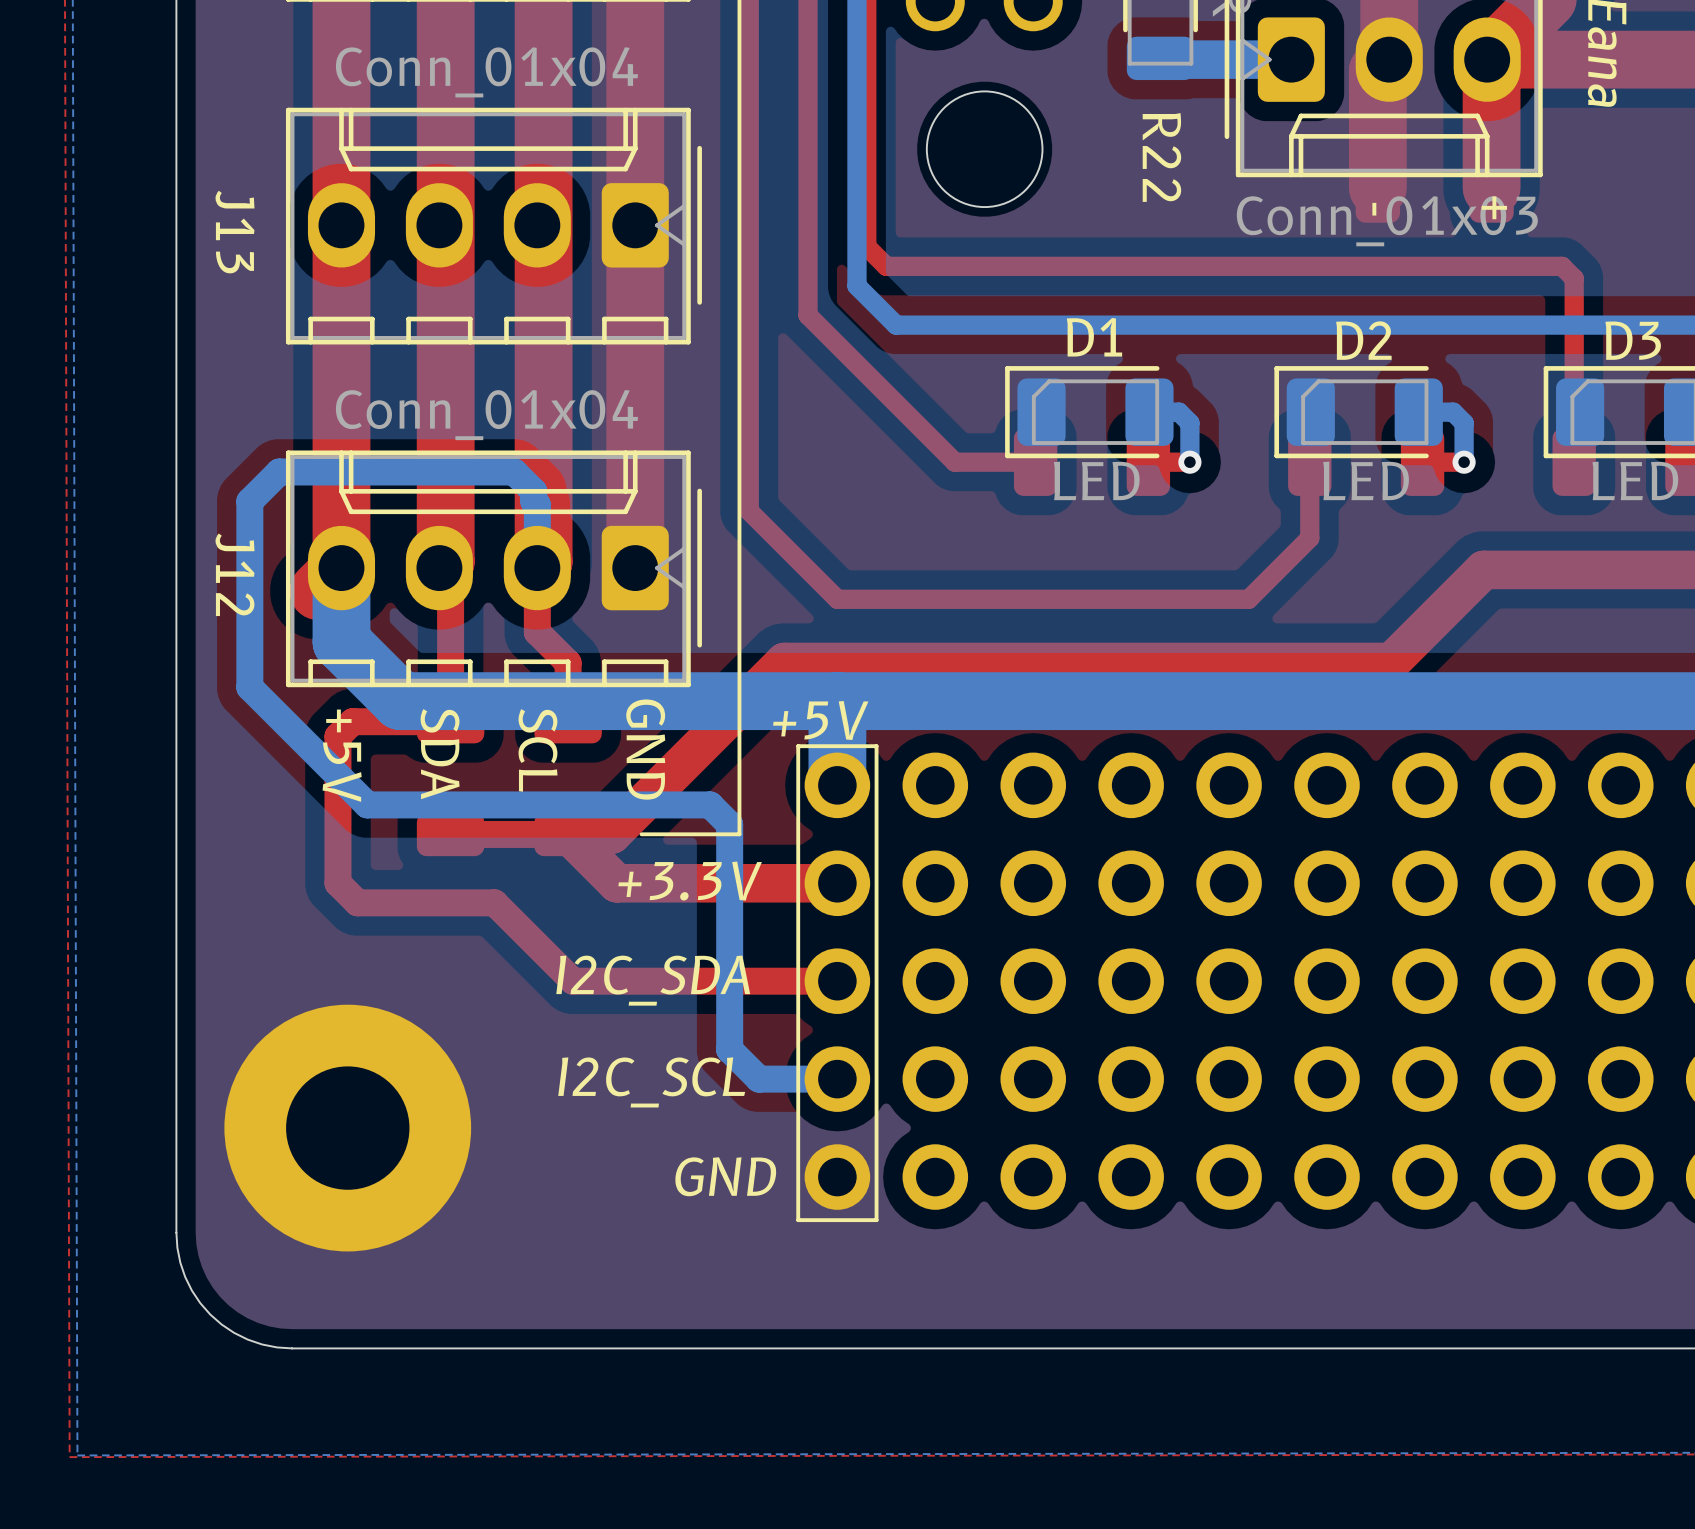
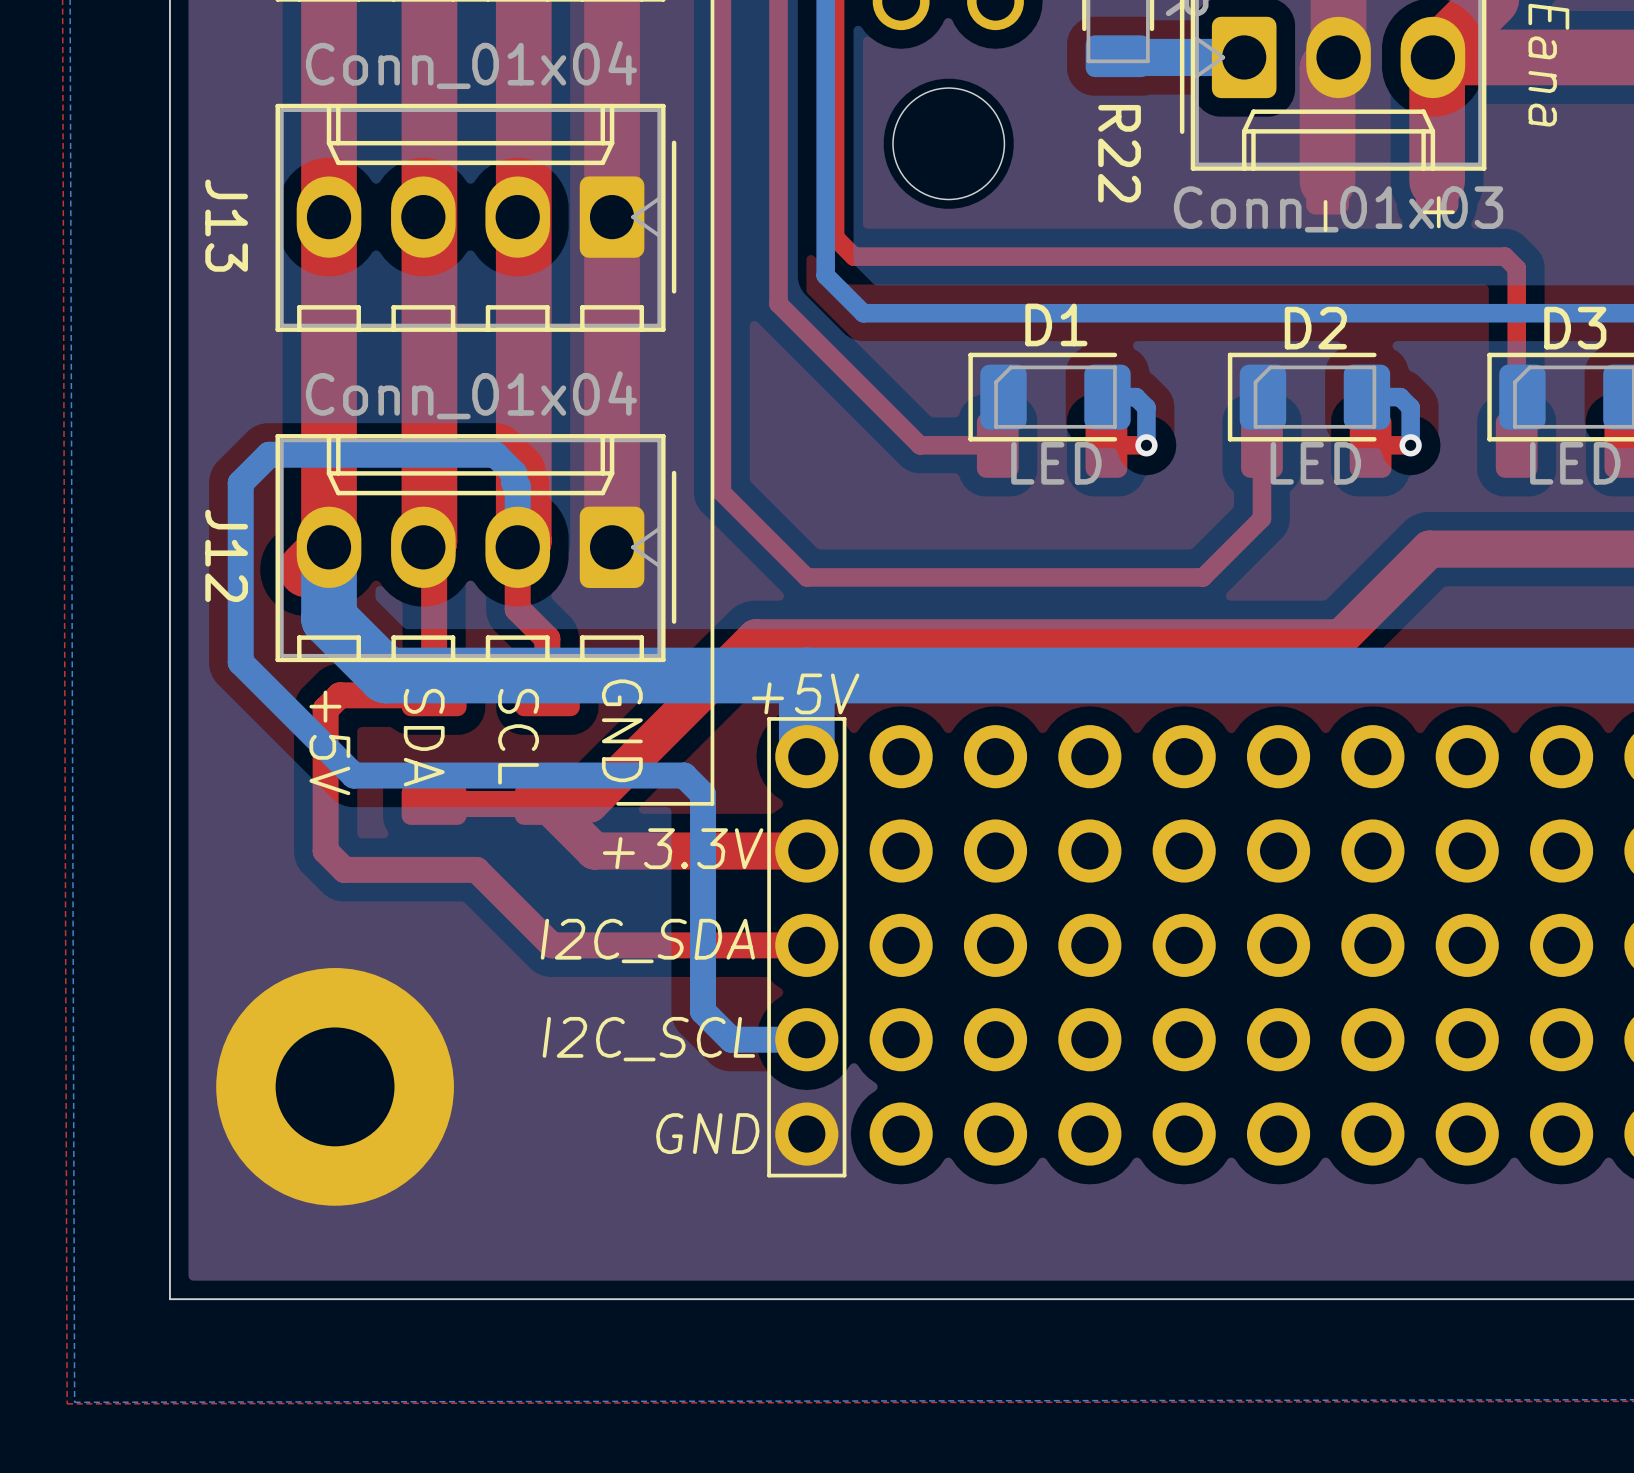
board edge: (176, 1232) (177, 1247) (185, 1277) (200, 1303) (210, 1314) (221, 1324) (247, 1339) (276, 1347) (292, 1348) -> (169, 1187) (169, 1299) (281, 1299)

